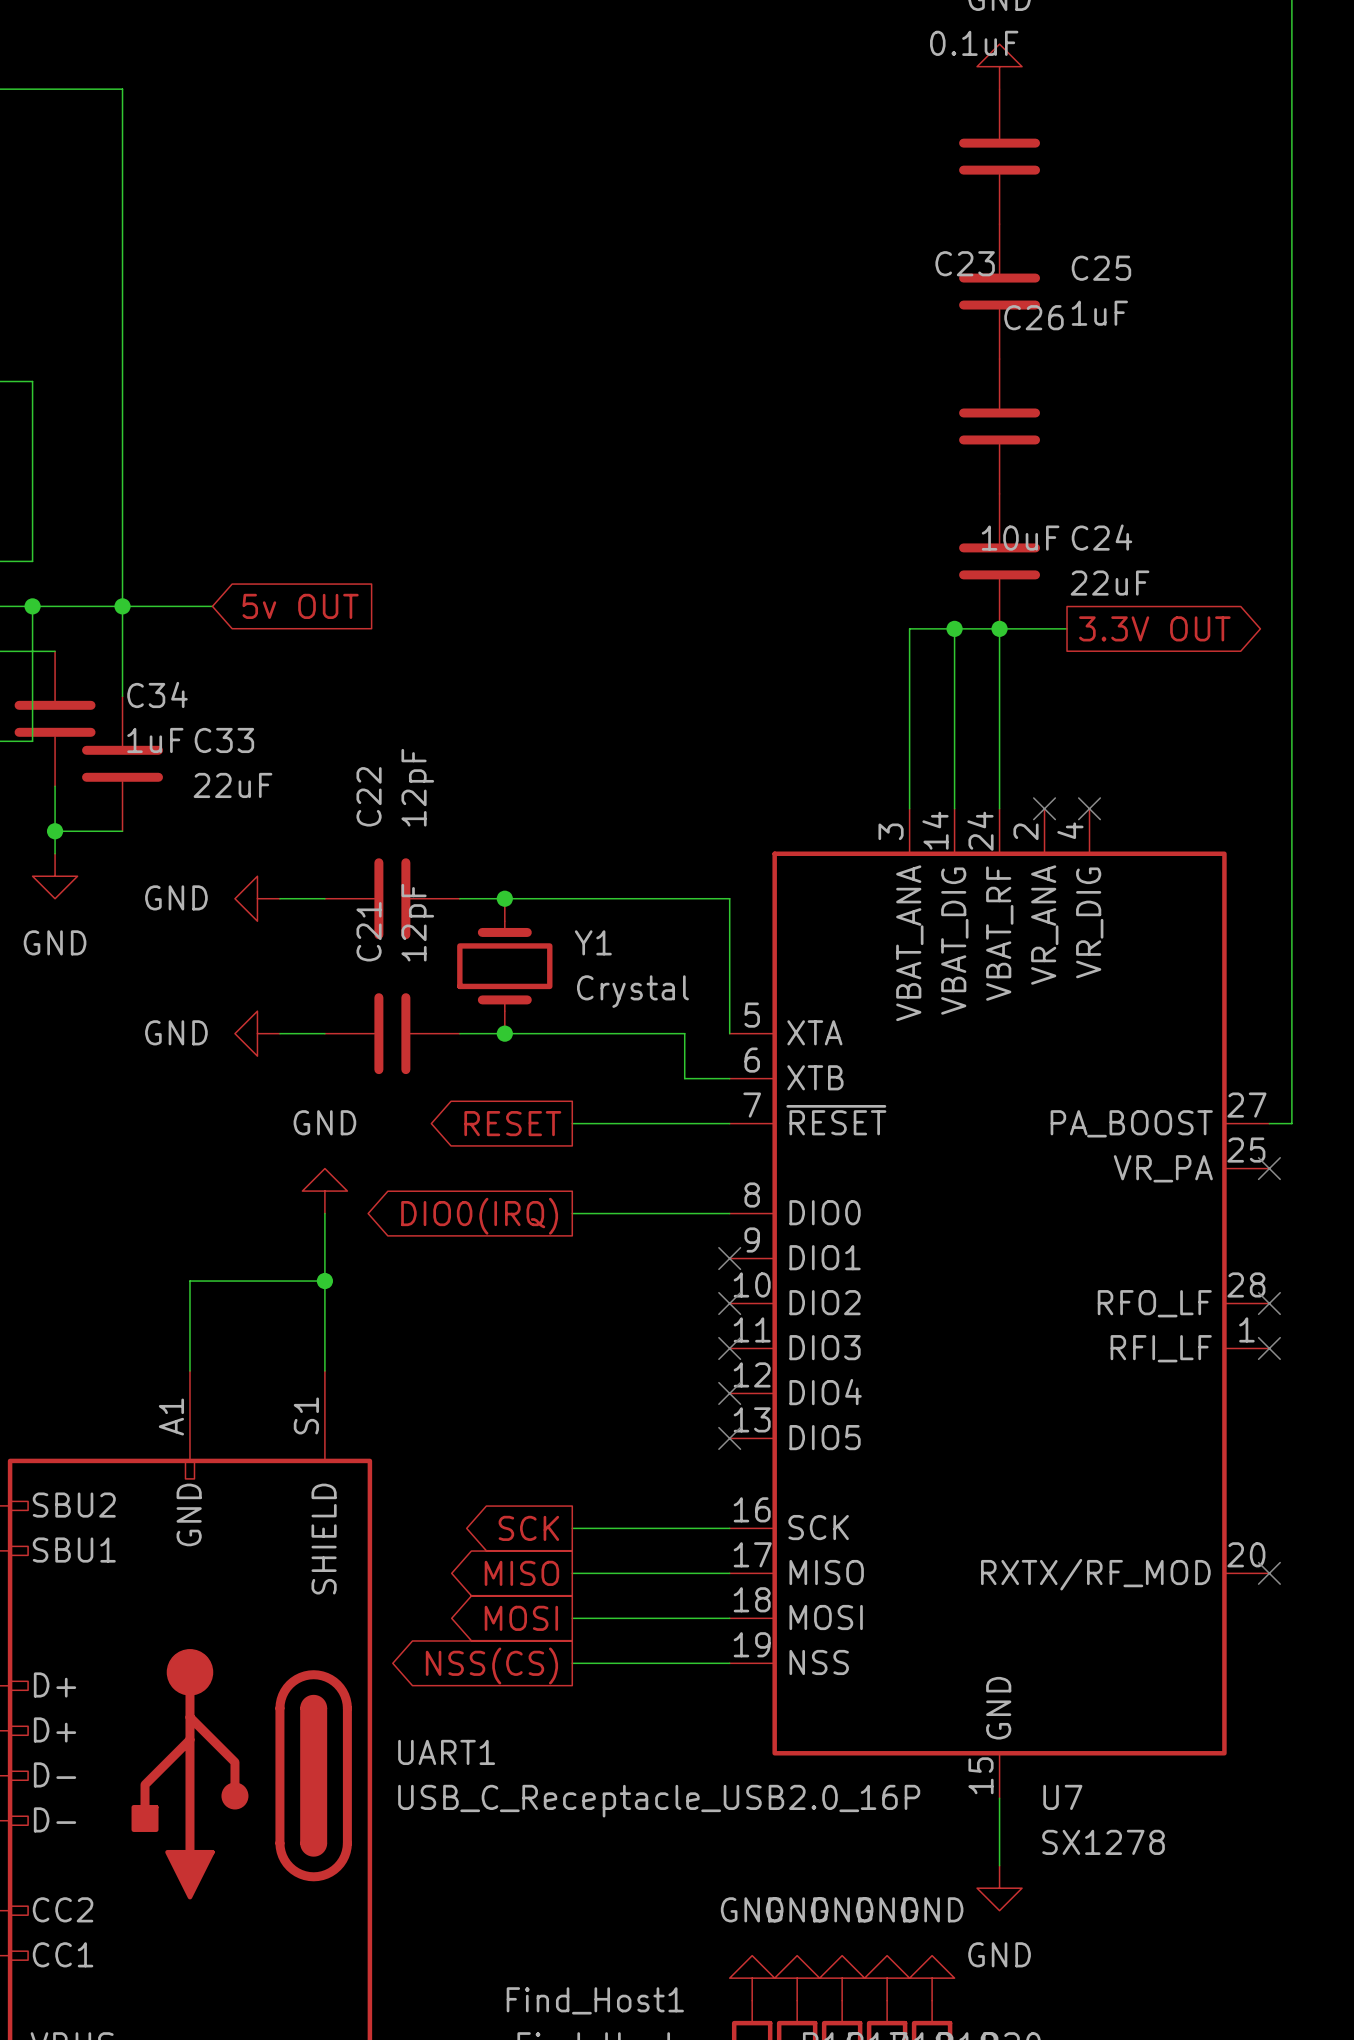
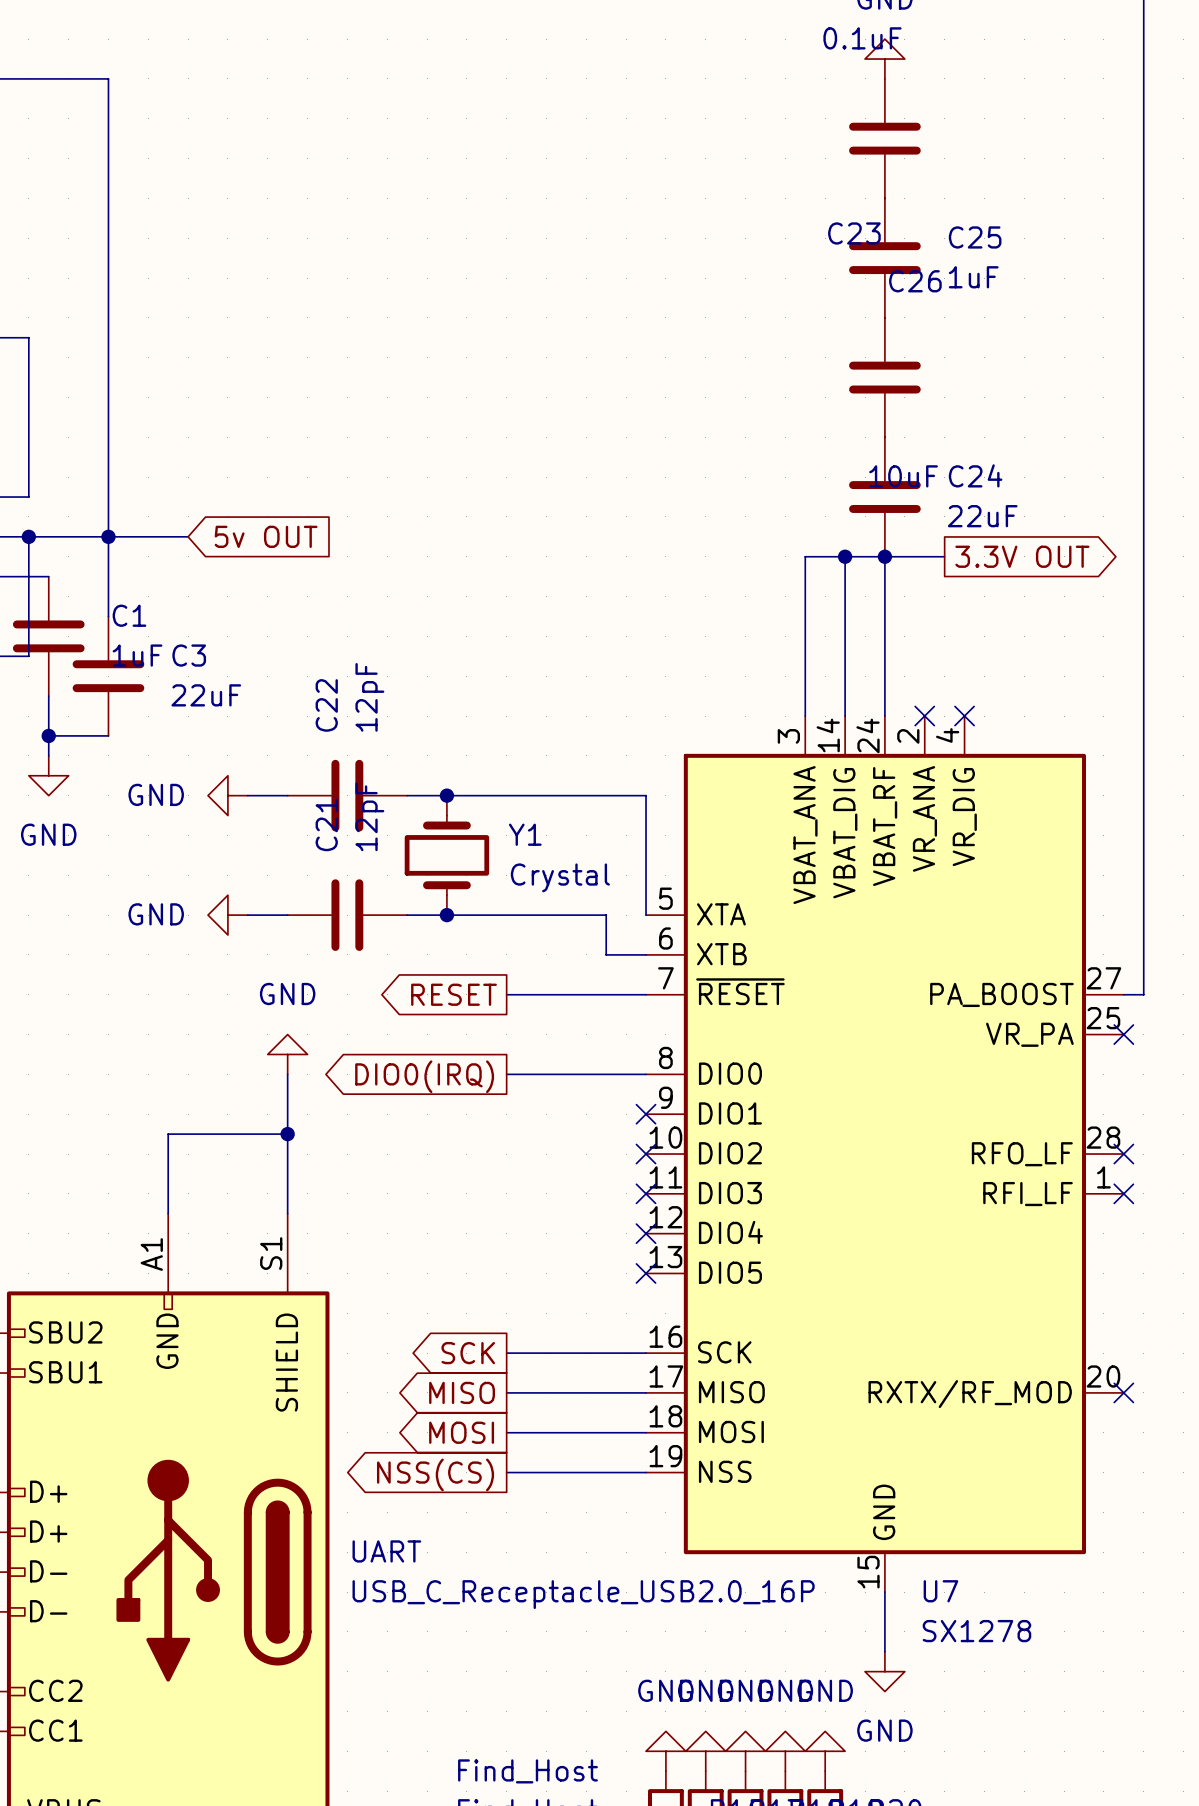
C34 name: C34 (157, 694) -> C1 (129, 615)
C33 name: C33 (224, 740) -> C3 (189, 655)
UART1 name: UART1 (446, 1752) -> UART (386, 1551)
Find_Host1 name: Find_Host1 (595, 2000) -> Find_Host (527, 1771)

